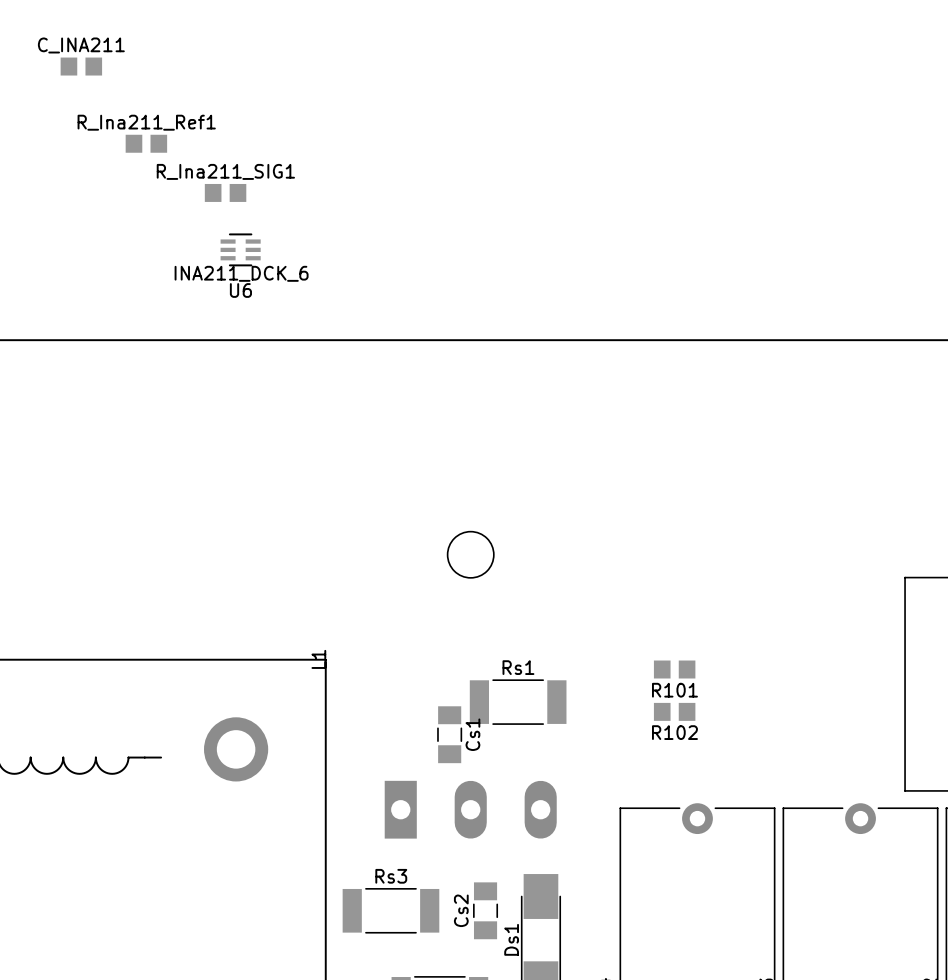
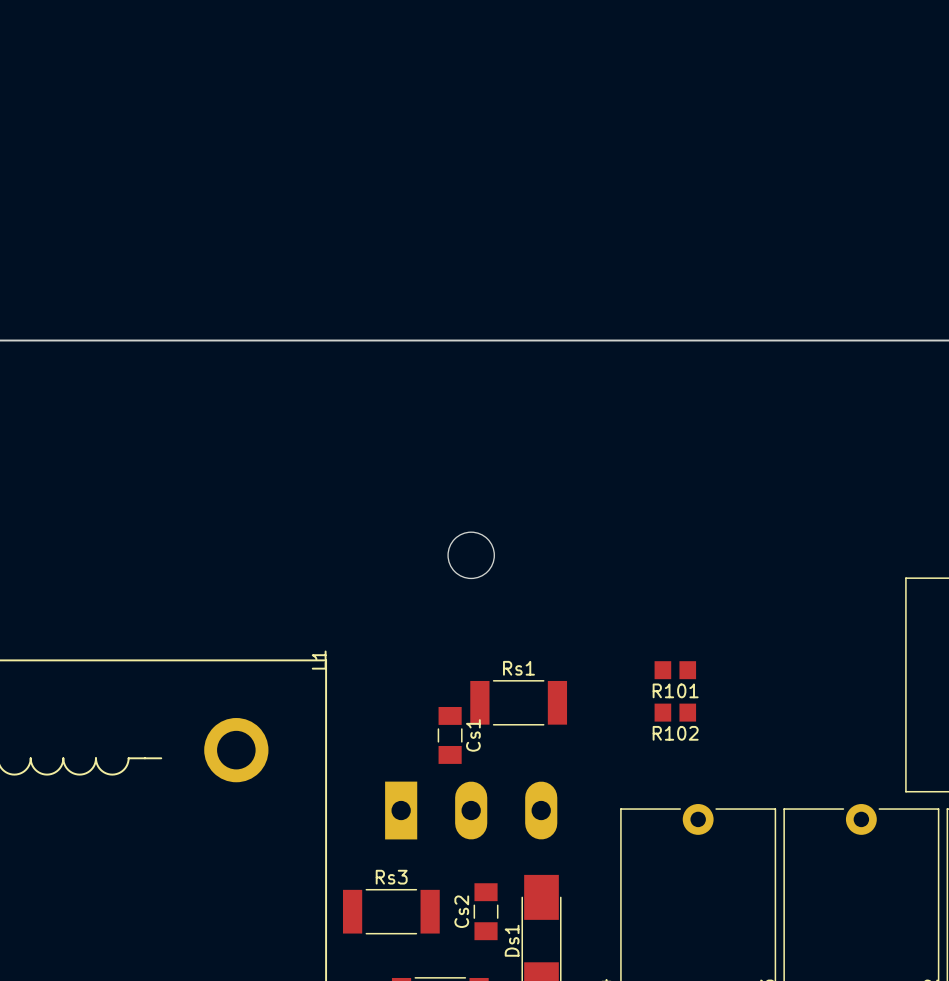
C_INA211: (81, 66) -> none
R_Ina211_Ref1: (146, 143) -> none
R_Ina211_SIG1: (225, 192) -> none
U6: INA211_DCK_6 (240, 249) -> none

